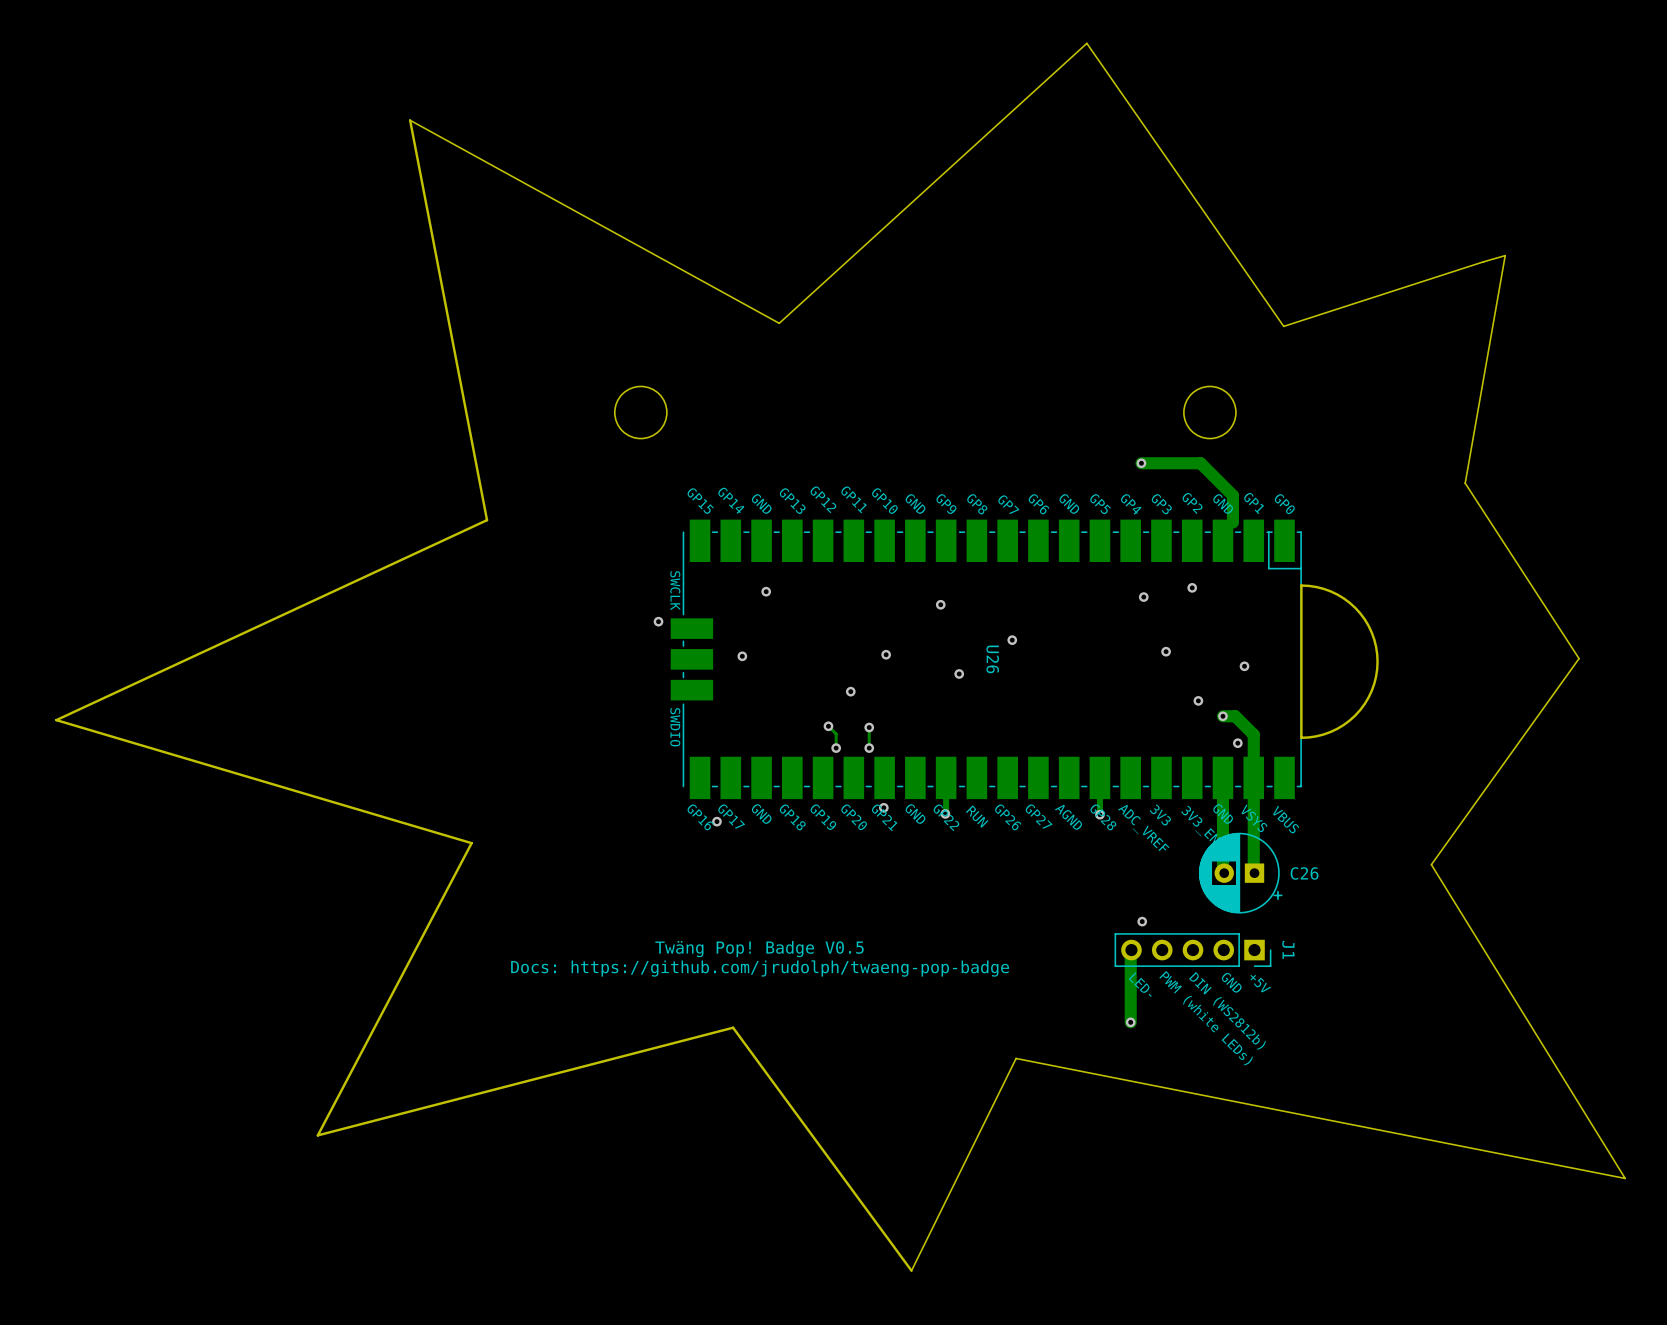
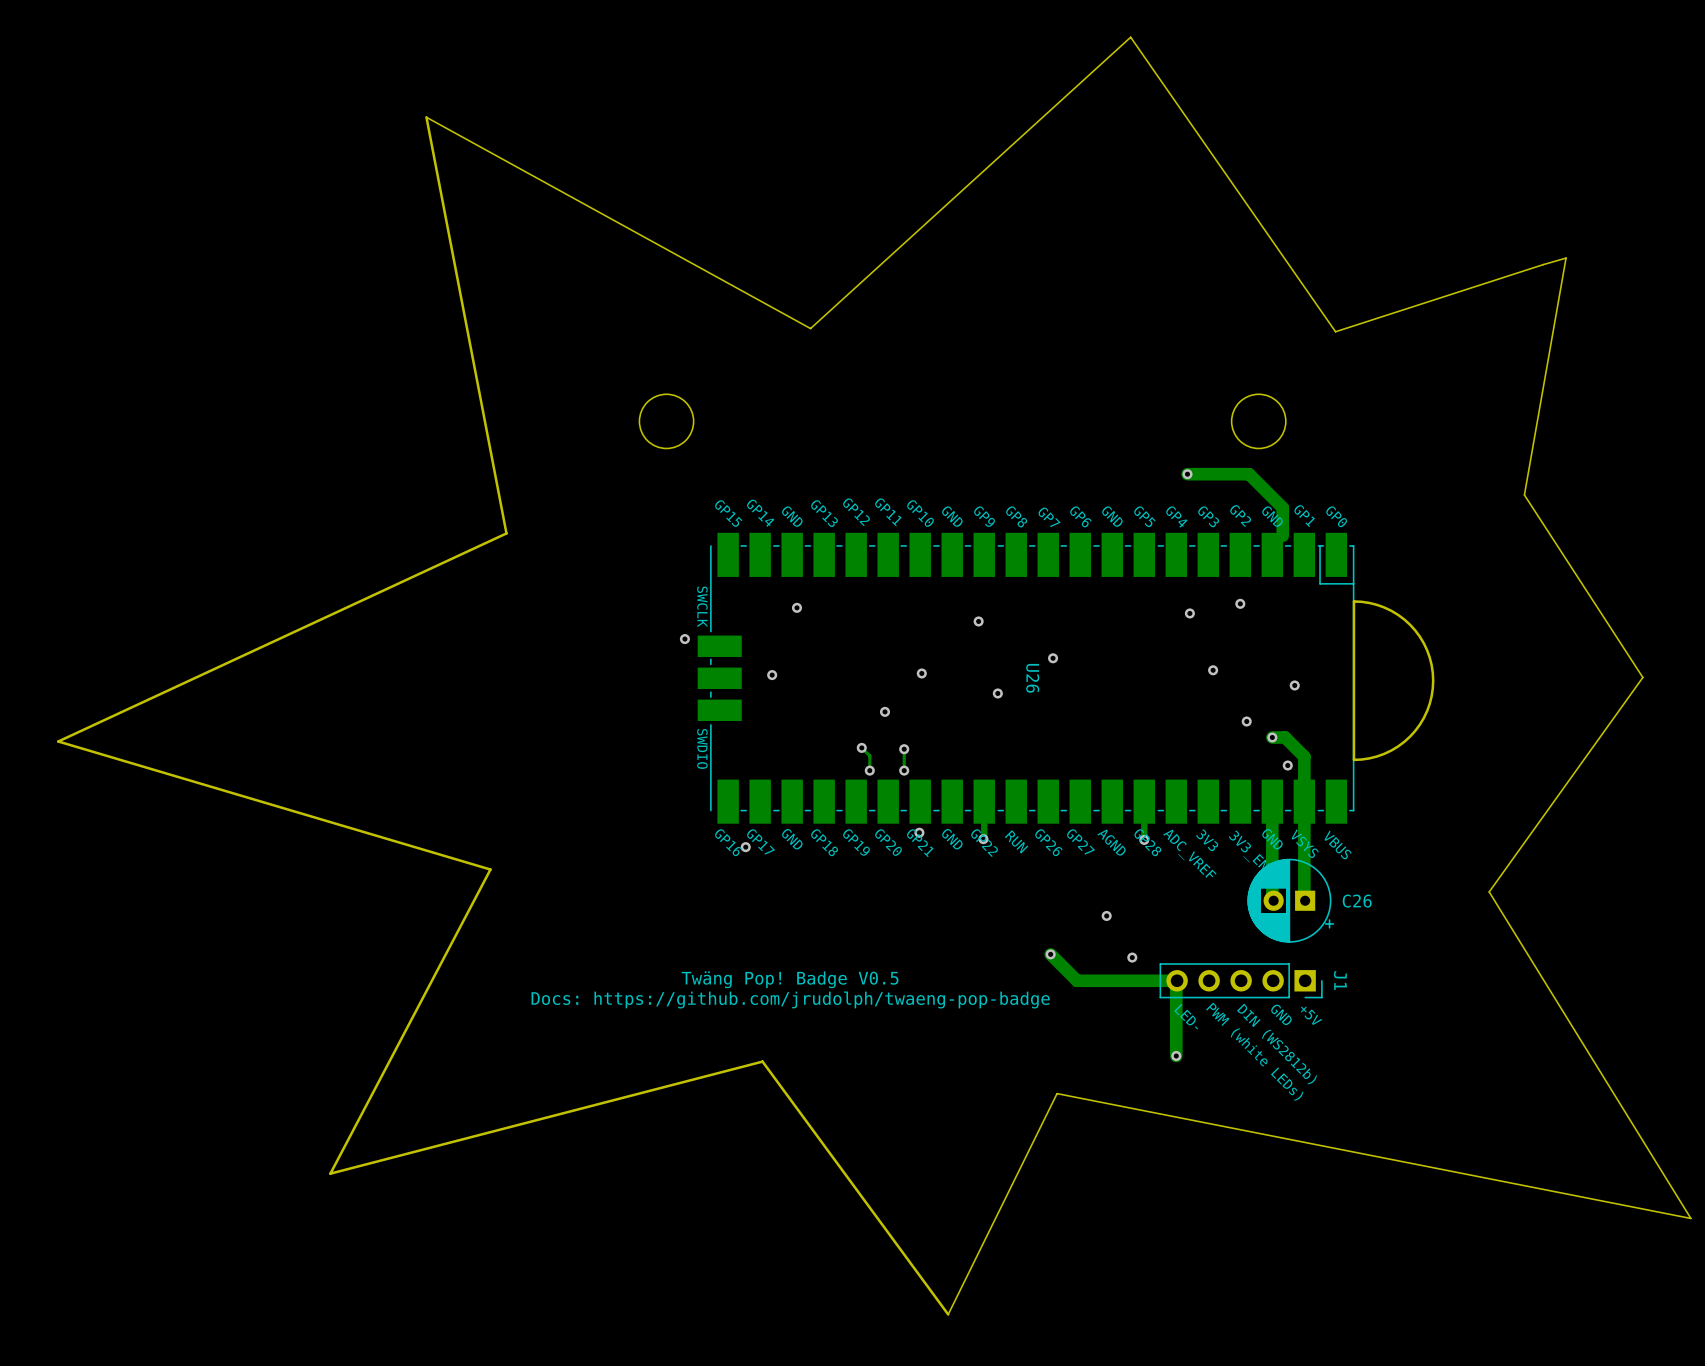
via: none -> (1106, 915)
via: (1142, 921) -> none
track: none -> (1050, 954) (1077, 980) (1177, 980)
via: none -> (1050, 954)
via: none -> (1132, 957)

